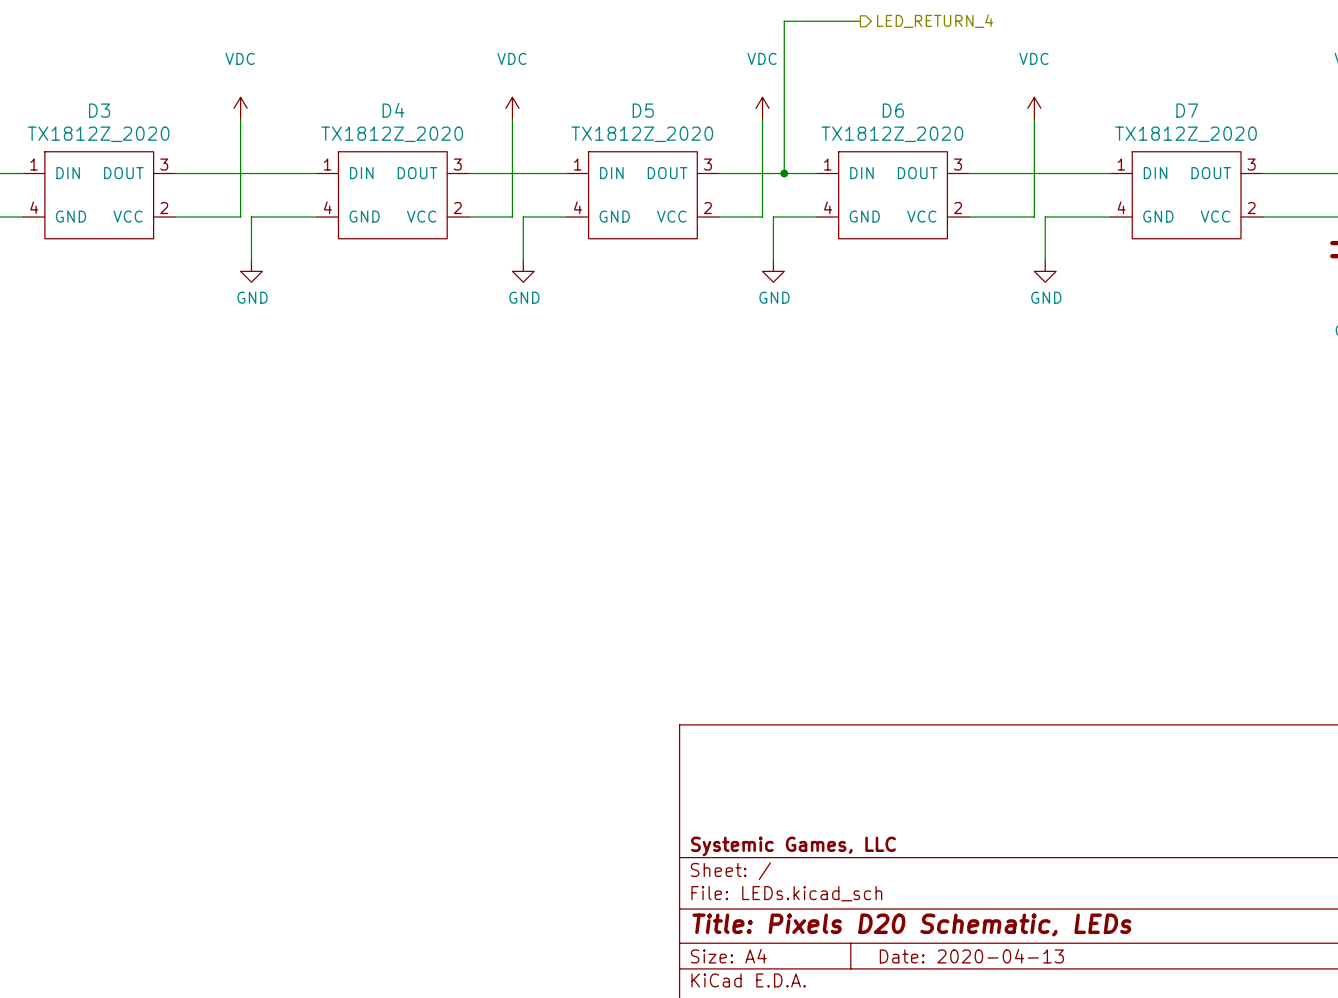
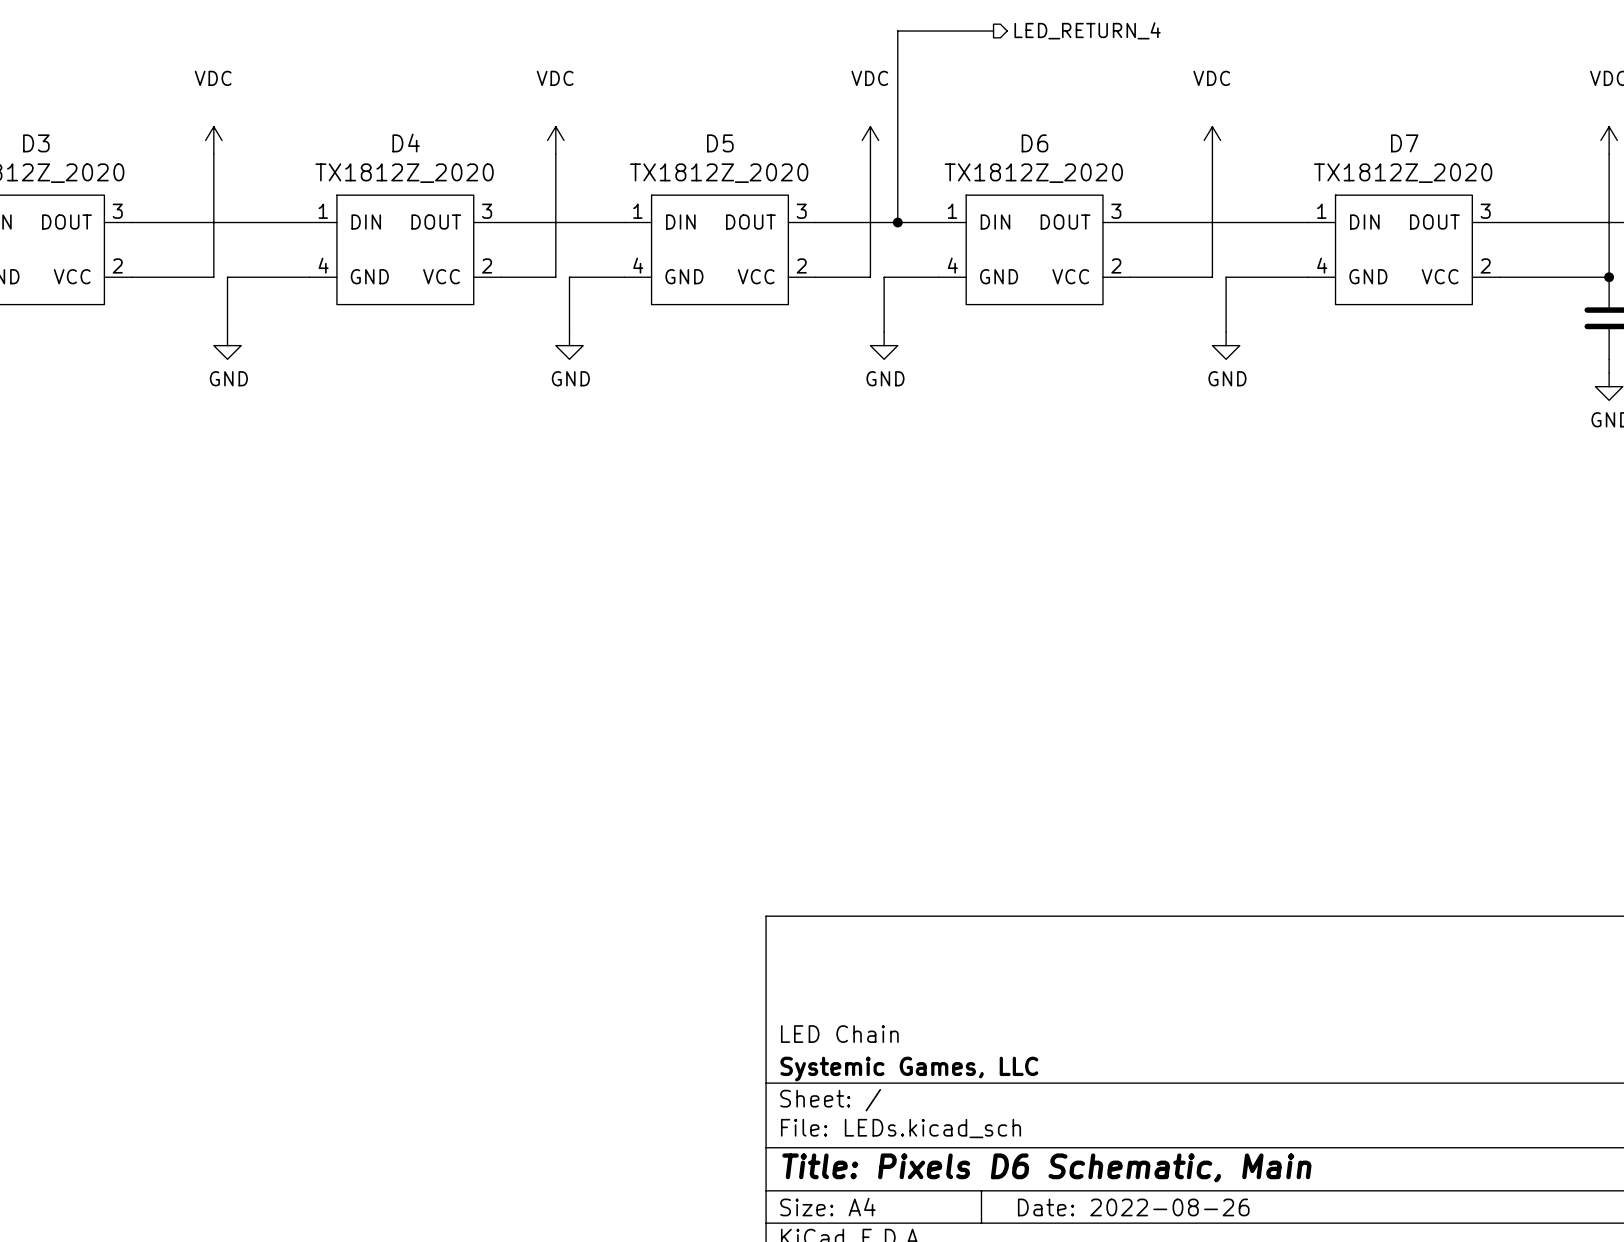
title block: none -> LED Chain (839, 1034)
title block: Title: Pixels D20 Schematic, LEDs (911, 924) -> Title: Pixels D6 Schematic, Main (1046, 1167)
title block: Date: 2020-04-13 (971, 956) -> Date: 2022-08-26 (1133, 1207)

